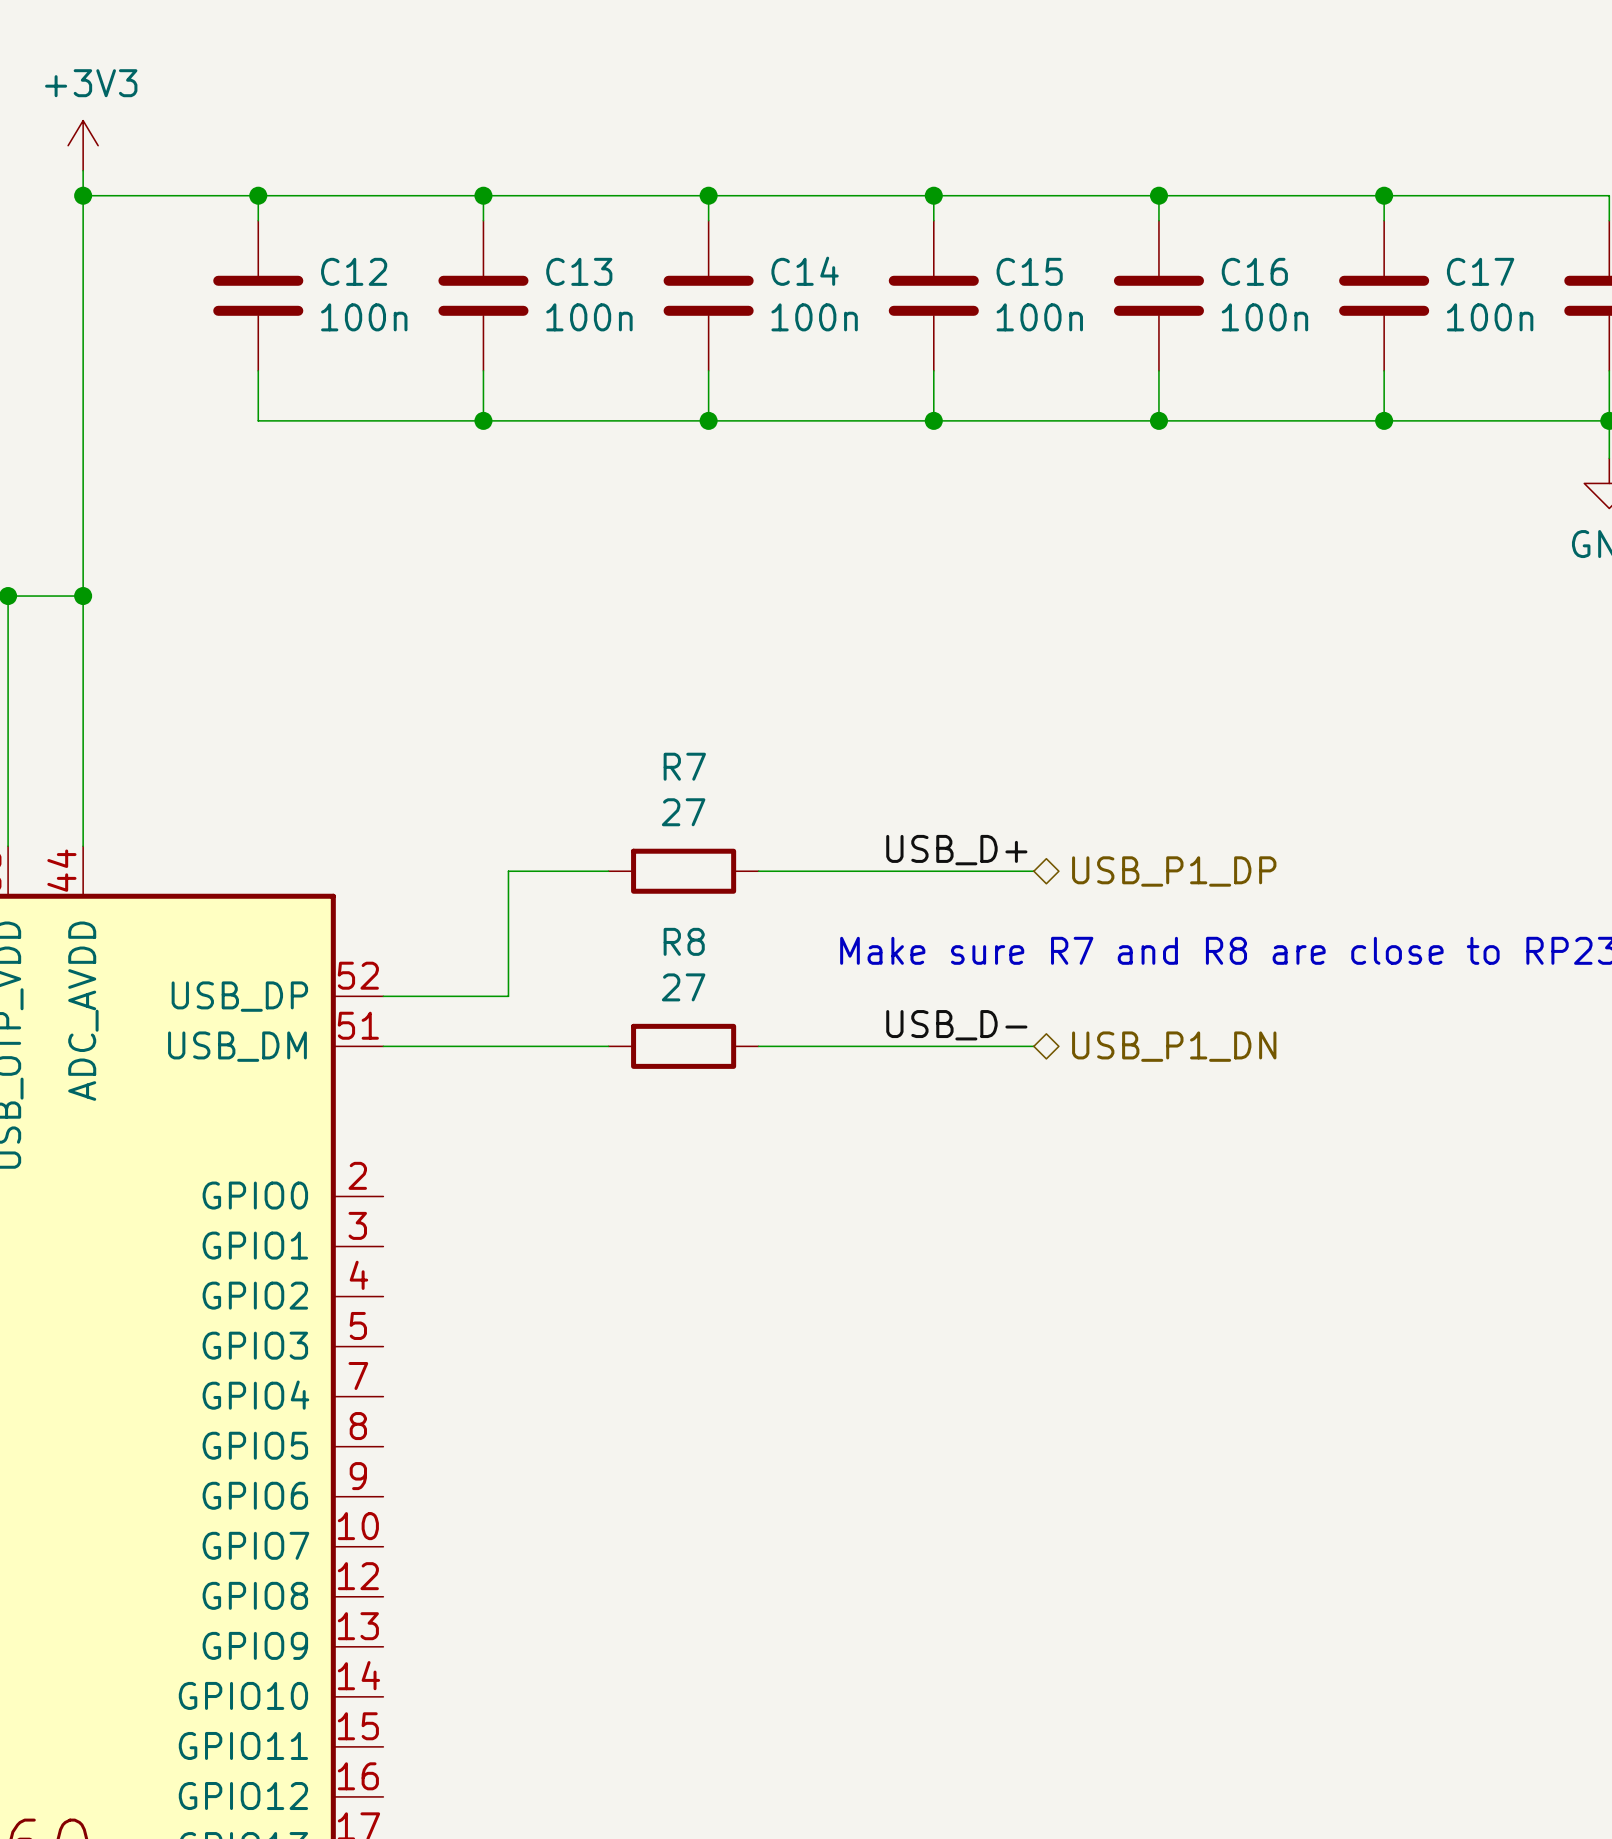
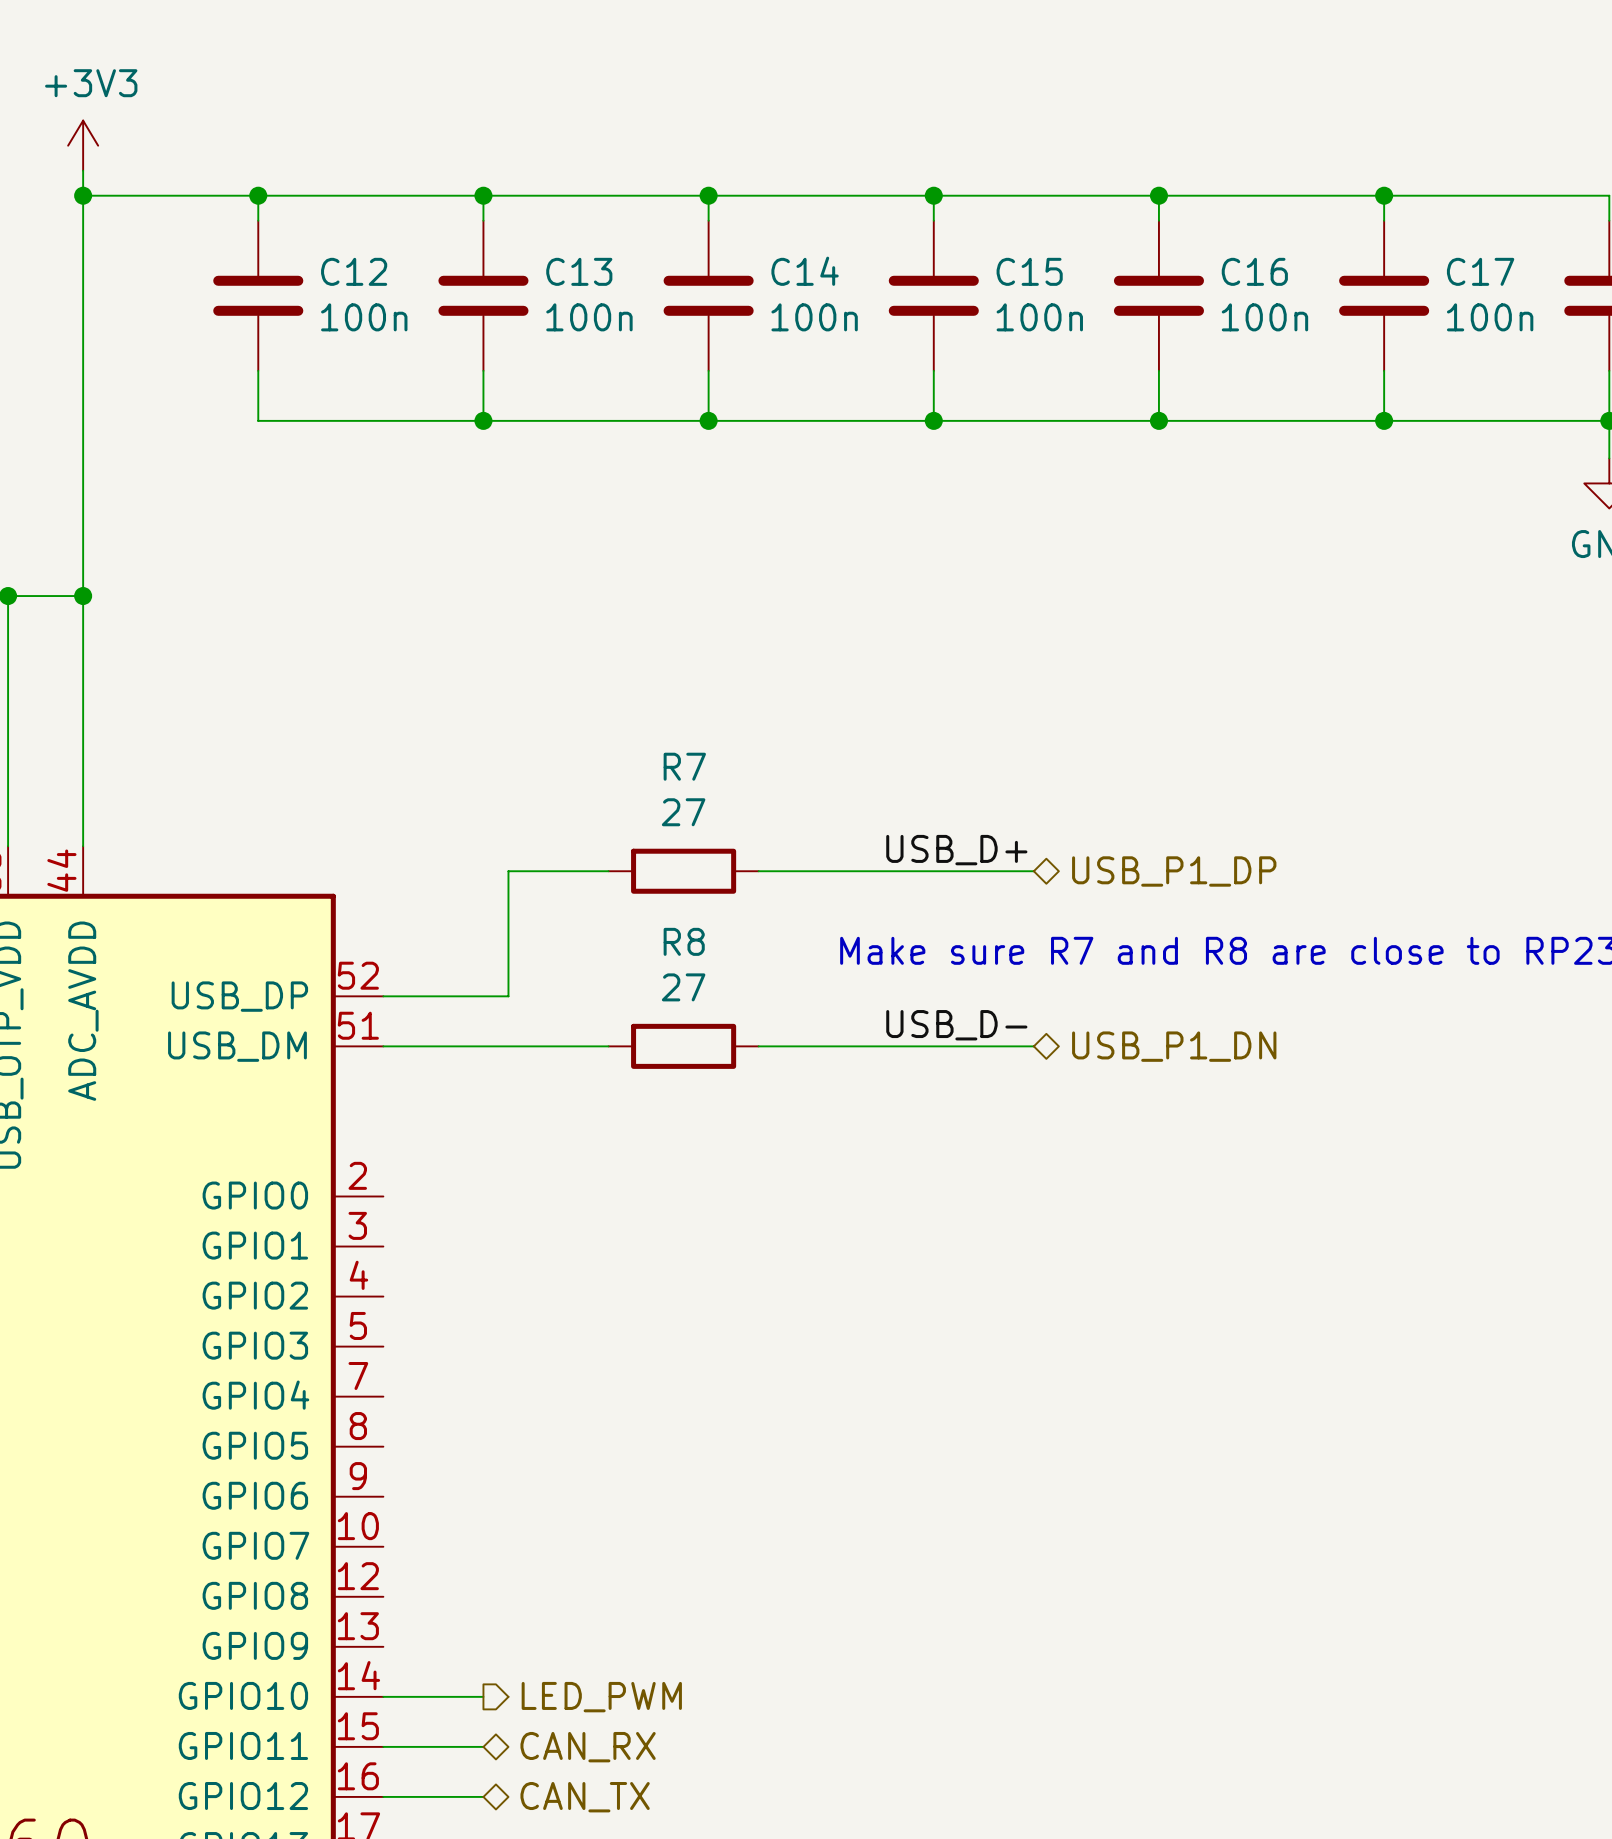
wire: none -> (383, 1696) (483, 1696)
hierarchical label: none -> LED_PWM (601, 1697)
wire: none -> (383, 1746) (483, 1746)
hierarchical label: none -> CAN_RX (588, 1747)
wire: none -> (383, 1796) (483, 1796)
hierarchical label: none -> CAN_TX (585, 1797)

